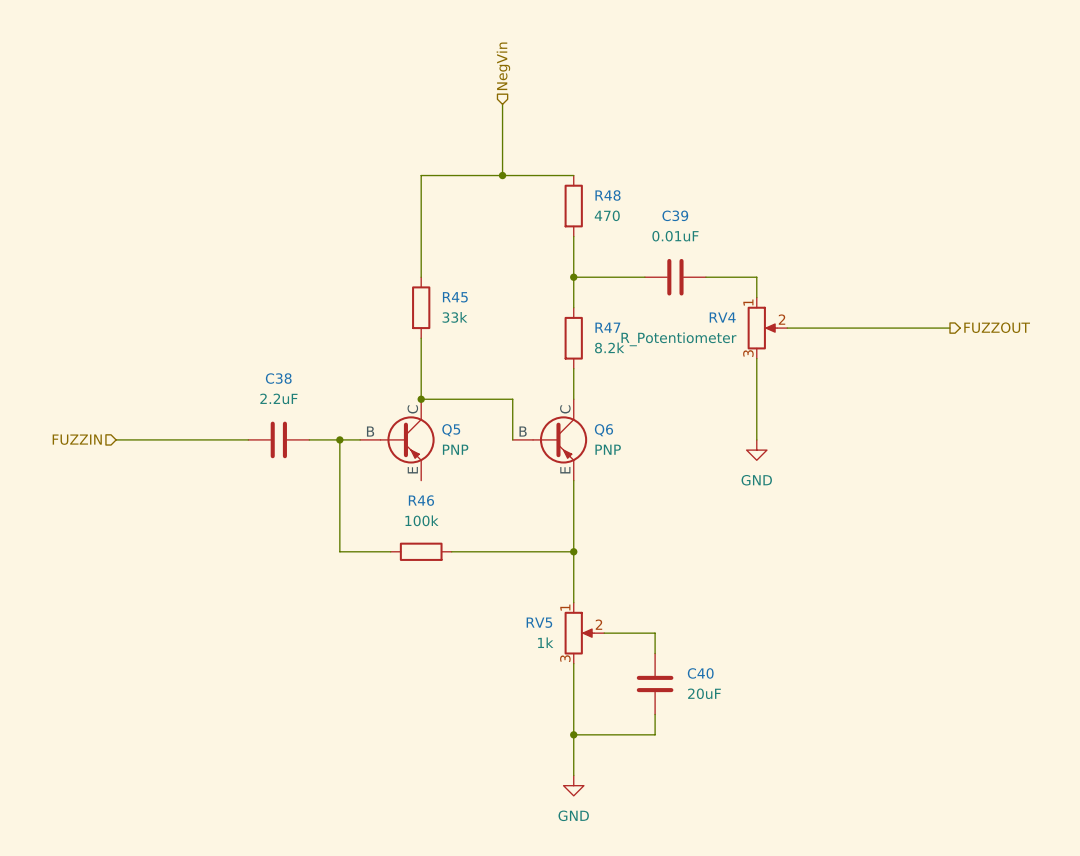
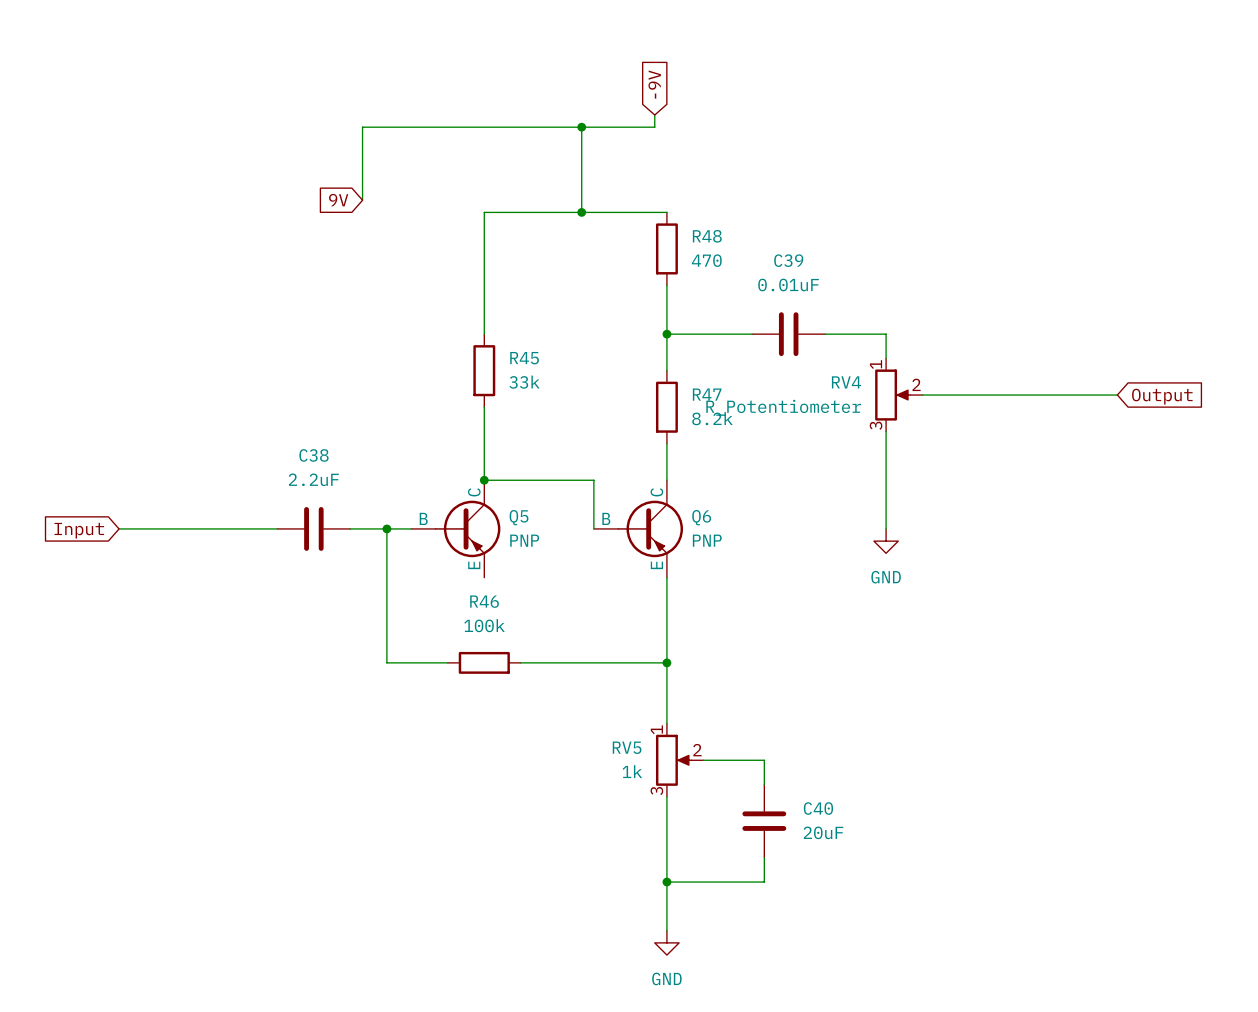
hierarchical label: NegVin (503, 66) -> none
global label: none -> -9V (654, 84)
wire: none -> (654, 115) (654, 127) (362, 127) (362, 200)
junction: none -> (581, 127)
global label: none -> 9V (338, 200)
hierarchical label: FUZZOUT (997, 327) -> none
global label: none -> Output (1162, 396)
hierarchical label: FUZZIN (77, 439) -> none
global label: none -> Input (79, 530)

